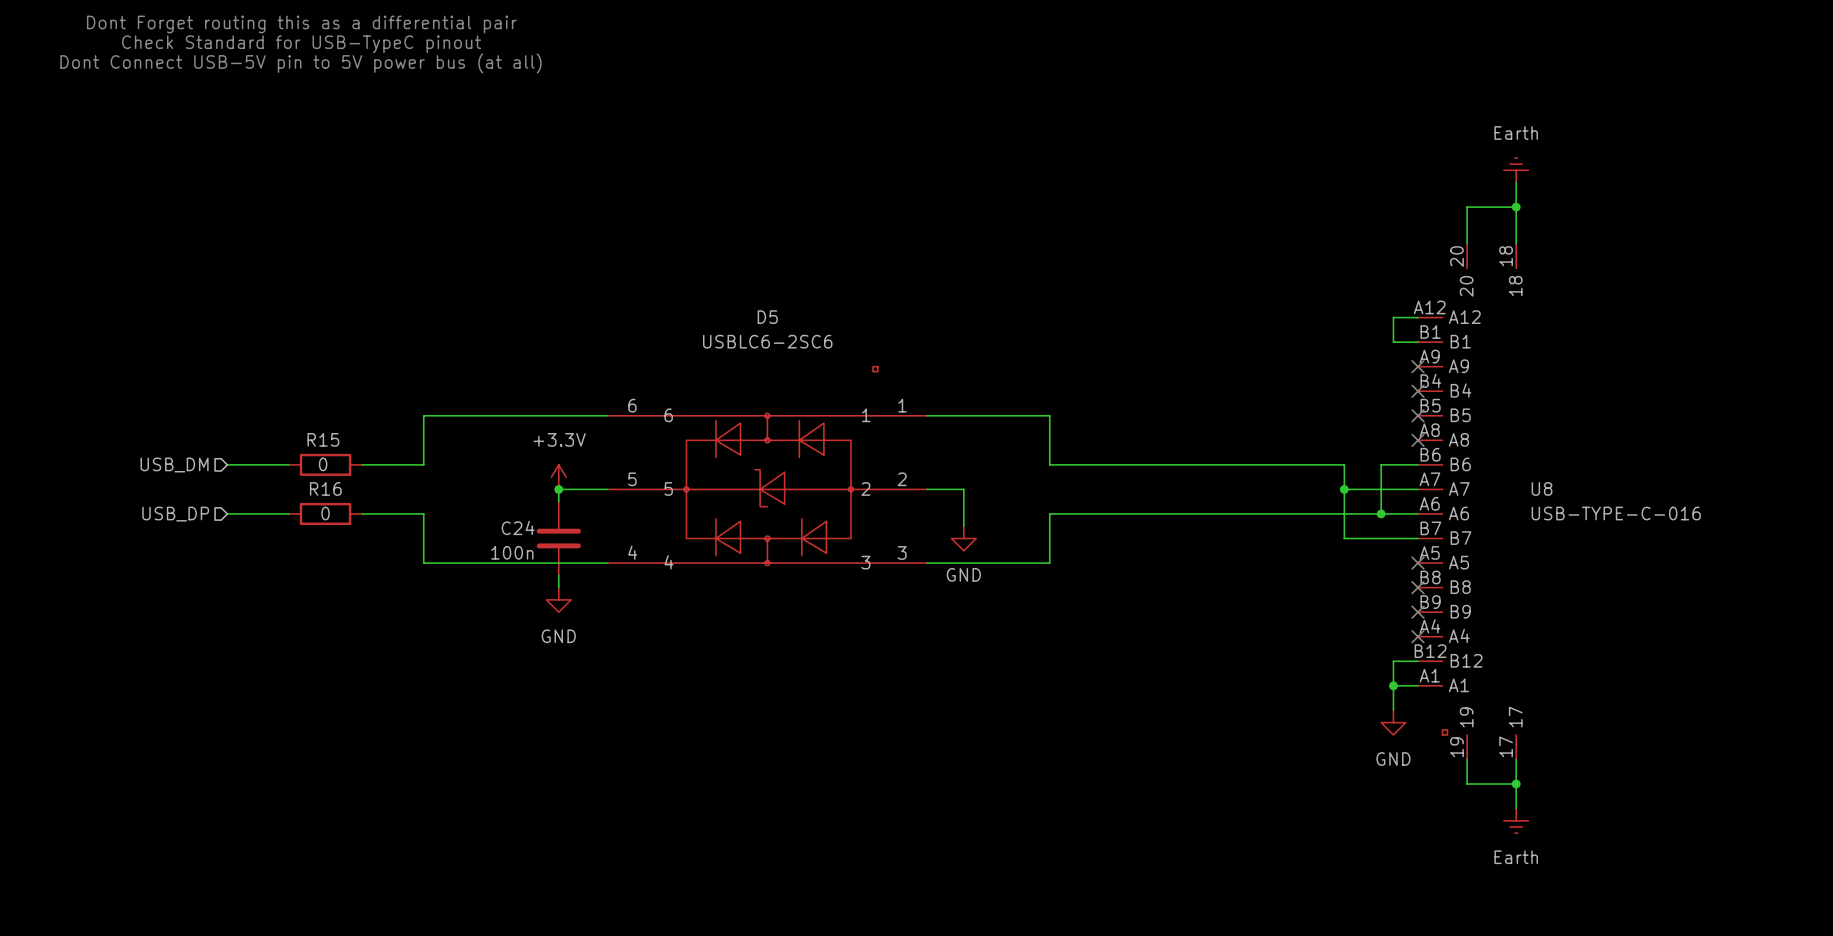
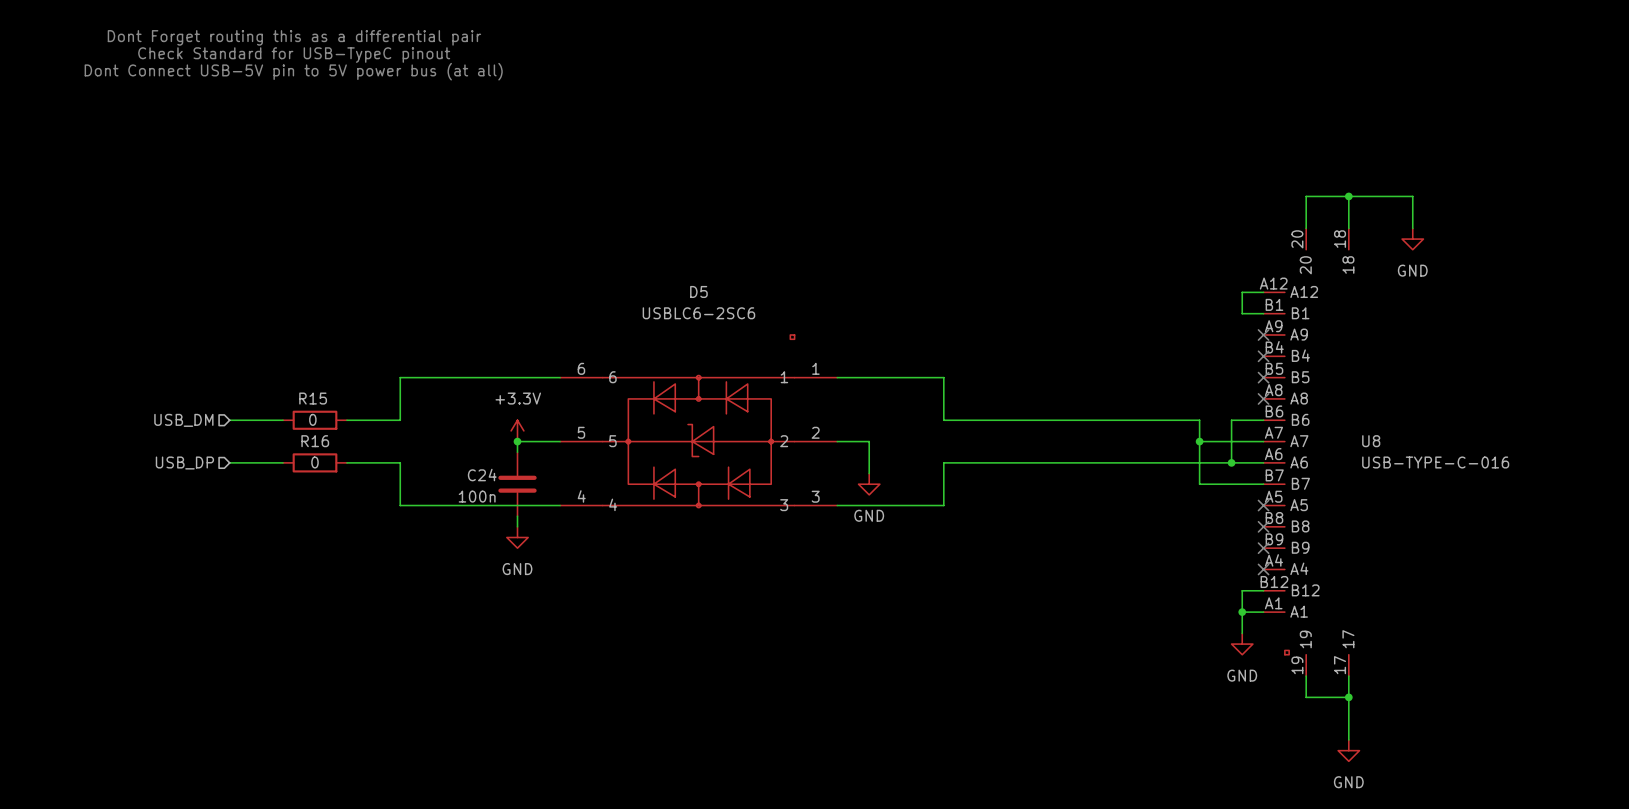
power symbol: Earth (1516, 170) -> none
wire: (1516, 182) (1516, 207) -> (1412, 228) (1412, 196) (1348, 196)
power symbol: none -> GND (1412, 239)
power symbol: Earth (1516, 820) -> none
power symbol: none -> GND (1348, 750)

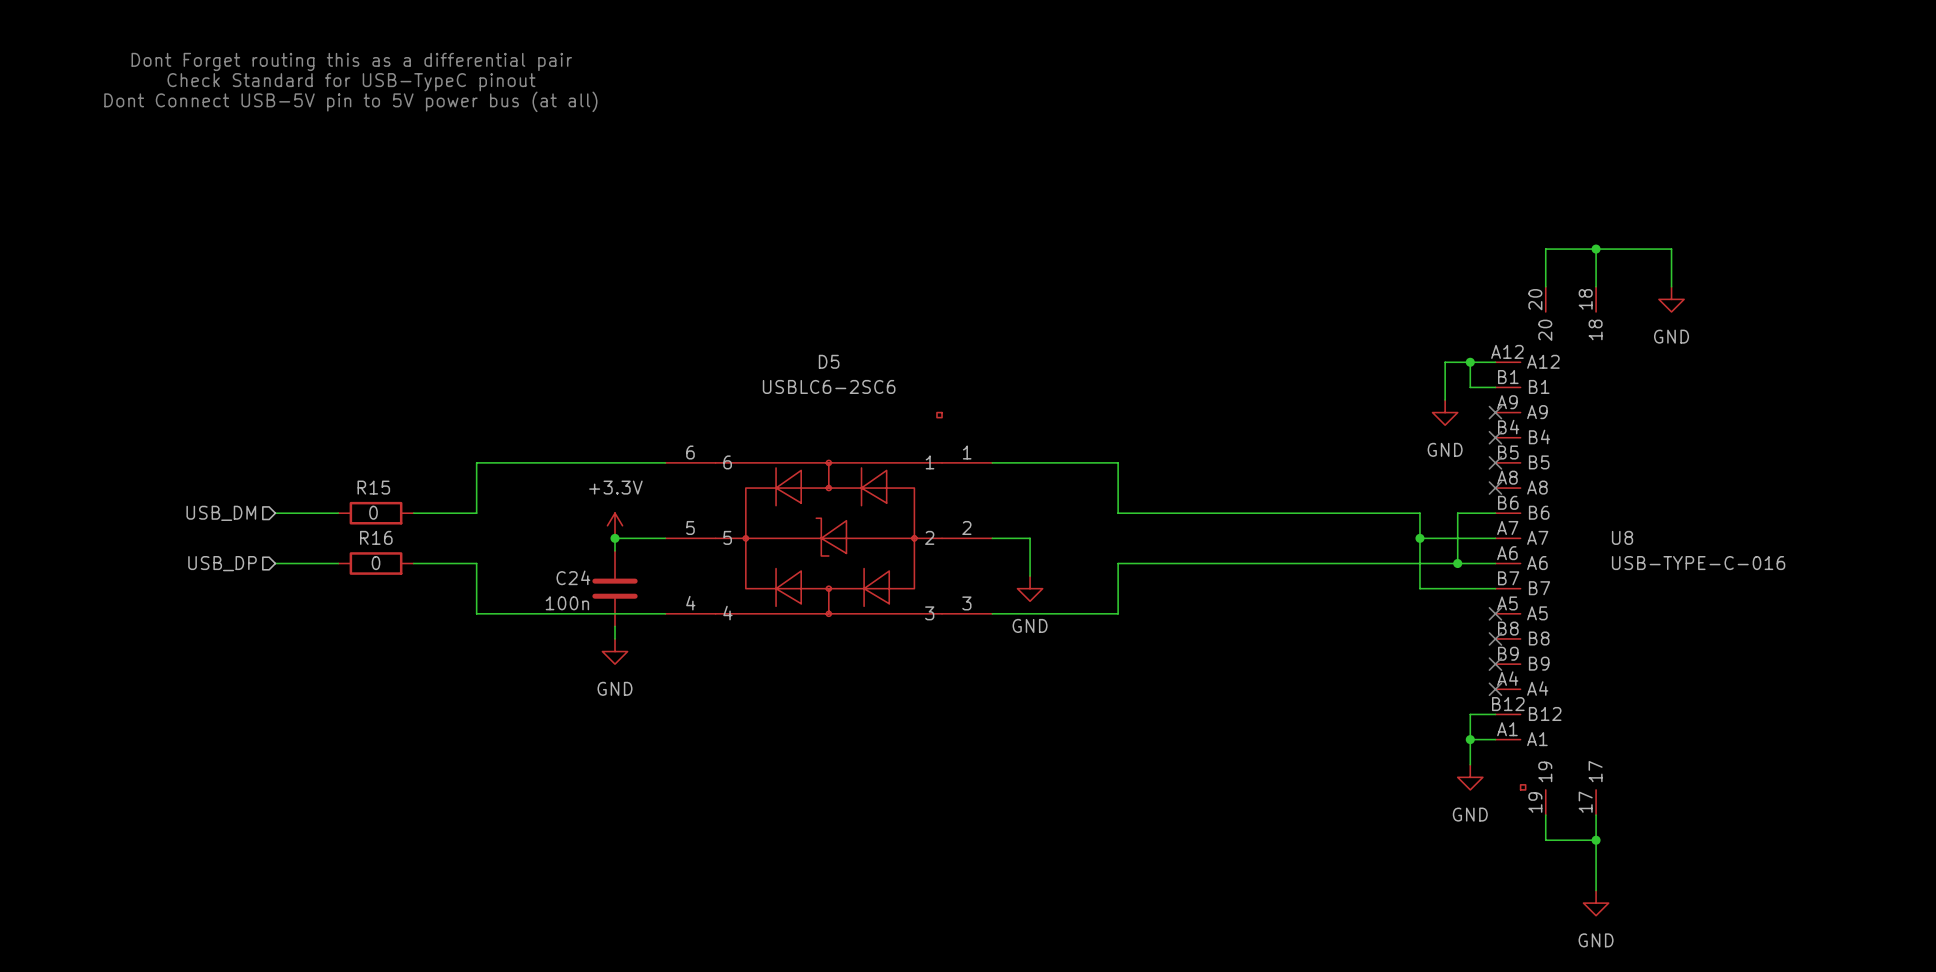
wire: none -> (1470, 362) (1445, 362) (1445, 400)
junction: none -> (1470, 362)
power symbol: none -> GND (1445, 412)

